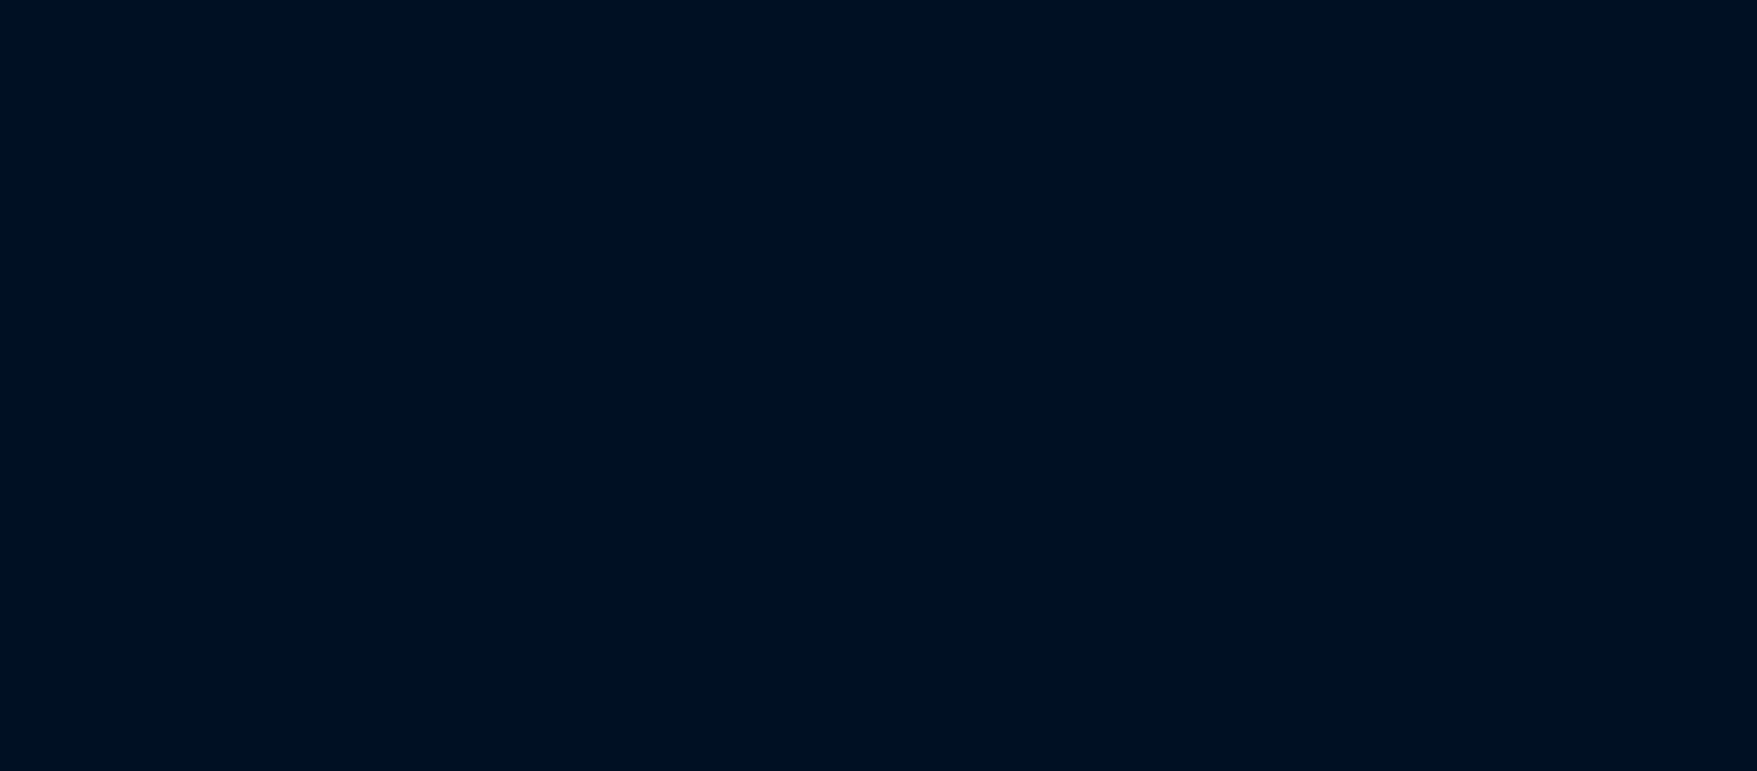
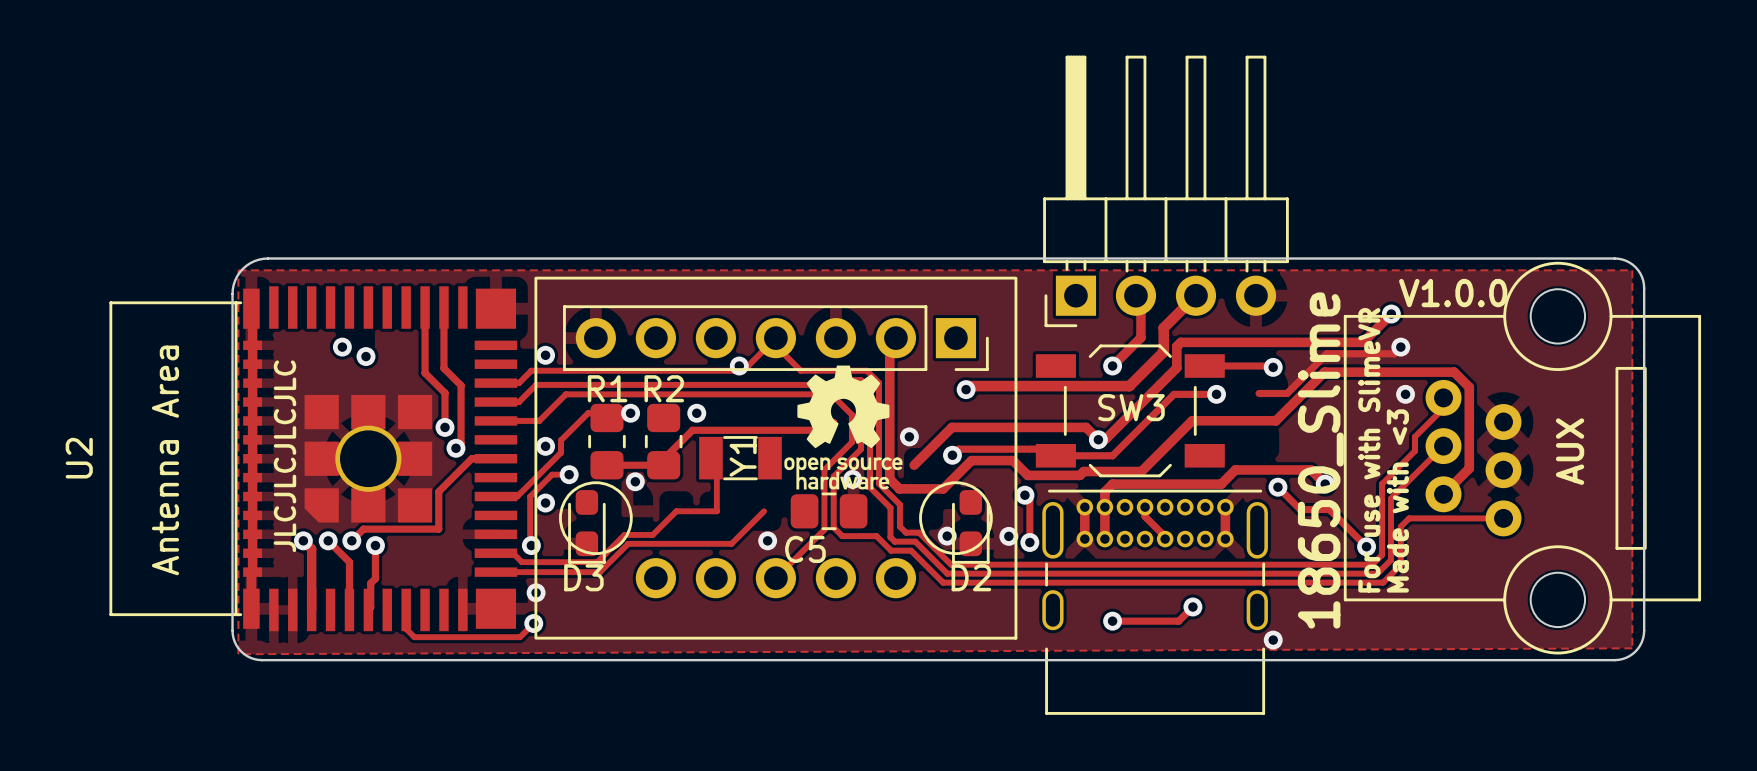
part: none -> (1165, 191)
board edge: none -> (267, 258) (1622, 259) (1629, 262) (1638, 270) (1643, 280) (1644, 288) (1643, 638) (1638, 648) (1632, 654) (1625, 657) (1614, 660) (254, 659) (247, 656) (238, 648) (234, 641) (232, 630) (232, 293) (235, 280) (242, 268) (254, 261) (267, 258)
zone outline: none -> (238, 270) (238, 654) (1632, 648) (1632, 270) (238, 270)
text: none -> V1.0.0 (1453, 293)
track: none -> (1135, 295) (1140, 300) (1140, 337) (1112, 366)
track: none -> (1195, 295) (1163, 327) (1163, 351) (1129, 386) (969, 386) (966, 389)
track: none -> (425, 307) (425, 373) (445, 393) (445, 427)
track: none -> (443, 307) (443, 368) (461, 385) (461, 443) (455, 448)
track: none -> (251, 308) (251, 608)
track: none -> (1391, 314) (1363, 342) (1180, 342) (1176, 346) (1176, 367) (1104, 439) (1098, 439) (1086, 427) (951, 427) (914, 465)
via: none -> (1391, 314)
track: none -> (895, 338) (889, 344) (889, 479) (899, 488) (943, 488) (971, 460) (1012, 460) (1027, 475) (1079, 475) (1083, 471) (1141, 471) (1192, 420) (1275, 420) (1324, 372) (1454, 372) (1469, 387) (1469, 468) (1443, 494)
via: none -> (342, 347)
track: none -> (1400, 347) (1394, 353) (1326, 353) (1287, 393) (1259, 393)
via: none -> (1400, 347)
via: none -> (545, 355)
via: none -> (366, 356)
drawing: none -> [784, 365, 903, 490]
track: none -> (739, 366) (748, 366) (775, 338) (775, 345) (800, 370) (866, 370) (878, 382) (878, 483) (899, 504) (899, 526) (905, 532) (919, 532) (951, 564) (1372, 564) (1382, 554) (1382, 484) (1414, 451) (1414, 436) (1443, 408) (1443, 397)
via: none -> (739, 366)
via: none -> (1112, 366)
track: none -> (1204, 366) (1273, 367)
via: none -> (1273, 367)
track: none -> (739, 370) (531, 370) (518, 383) (495, 383)
via: none -> (966, 389)
track: none -> (1216, 394) (1174, 394) (1112, 455) (1055, 455) (1049, 449) (958, 449) (952, 455)
via: none -> (1216, 394)
via: none -> (1405, 394)
track: none -> (854, 395) (860, 402) (860, 449) (833, 476) (833, 527) (842, 536) (876, 536) (891, 550) (911, 550) (943, 582) (1383, 582) (1400, 564) (1400, 526) (1409, 518) (1503, 518)
track: none -> (495, 402) (518, 402) (536, 384) (843, 384) (848, 380) (860, 380) (869, 389) (869, 487) (890, 507) (890, 537) (894, 541) (915, 541) (947, 573) (1377, 573) (1391, 560) (1391, 498) (1443, 446)
SW3: none -> (1130, 410)
track: none -> (630, 413) (588, 413) (561, 440) (561, 452) (517, 496) (495, 496)
via: none -> (630, 413)
via: none -> (696, 413)
track: none -> (495, 420) (539, 420) (565, 394) (831, 394) (851, 414) (851, 442) (824, 469) (824, 529) (775, 578)
track: none -> (829, 422) (833, 422) (826, 430) (692, 430) (663, 459) (663, 465) (606, 465)
via: none -> (445, 427)
via: none -> (909, 436)
via: none -> (1098, 439)
R1: none -> (606, 441)
R2: none -> (663, 441)
via: none -> (545, 446)
via: none -> (455, 448)
text: none -> For use with SlimeVR (1369, 450)
text: none -> AUX (1570, 451)
via: none -> (952, 455)
text: none -> JLCJLCJLCJLC (284, 456)
U2: none -> (313, 458)
track: none -> (495, 458) (471, 458) (438, 491) (438, 529) (363, 529) (351, 540)
track: none -> (710, 458) (716, 464) (716, 511) (676, 511) (652, 534) (624, 534) (597, 562) (521, 562) (513, 553) (495, 553)
Y1: none -> (740, 458)
part: none -> (775, 458)
part: none -> (1522, 458)
text: none -> 18650_Slime (1320, 460)
track: none -> (569, 474) (552, 474) (530, 496) (531, 545)
via: none -> (569, 474)
via: none -> (852, 479)
via: none -> (635, 481)
track: none -> (1325, 484) (1311, 469) (1235, 469) (1221, 484) (1112, 484) (1104, 491) (1104, 539)
via: none -> (1325, 484)
track: none -> (1277, 487) (1300, 509) (1329, 509) (1366, 546)
via: none -> (1277, 487)
track: none -> (1024, 495) (1029, 500) (1029, 542)
via: none -> (1024, 495)
text: none -> Made with <3 (1397, 500)
via: none -> (545, 503)
track: none -> (1084, 507) (1084, 539)
track: none -> (1145, 507) (1145, 516) (1165, 536) (1165, 539)
track: none -> (1225, 507) (1225, 539)
track: none -> (764, 511) (731, 543) (628, 543) (599, 572) (495, 572)
C5: none -> (829, 511)
D3: none -> (586, 526)
D2: none -> (970, 526)
via: none -> (947, 536)
via: none -> (1008, 536)
track: none -> (303, 540) (311, 549) (311, 609)
via: none -> (303, 540)
track: none -> (328, 540) (349, 562) (349, 609)
via: none -> (328, 540)
via: none -> (351, 540)
via: none -> (767, 540)
via: none -> (1029, 542)
track: none -> (375, 545) (375, 578) (370, 583) (370, 607) (368, 609)
via: none -> (375, 545)
via: none -> (531, 545)
via: none -> (1366, 546)
via: none -> (536, 592)
part: none -> (1155, 602)
track: none -> (1192, 606) (1178, 621) (1112, 621)
via: none -> (1192, 606)
track: none -> (406, 609) (406, 628) (414, 637) (520, 637) (533, 623)
via: none -> (1112, 621)
via: none -> (533, 623)
via: none -> (1273, 640)

